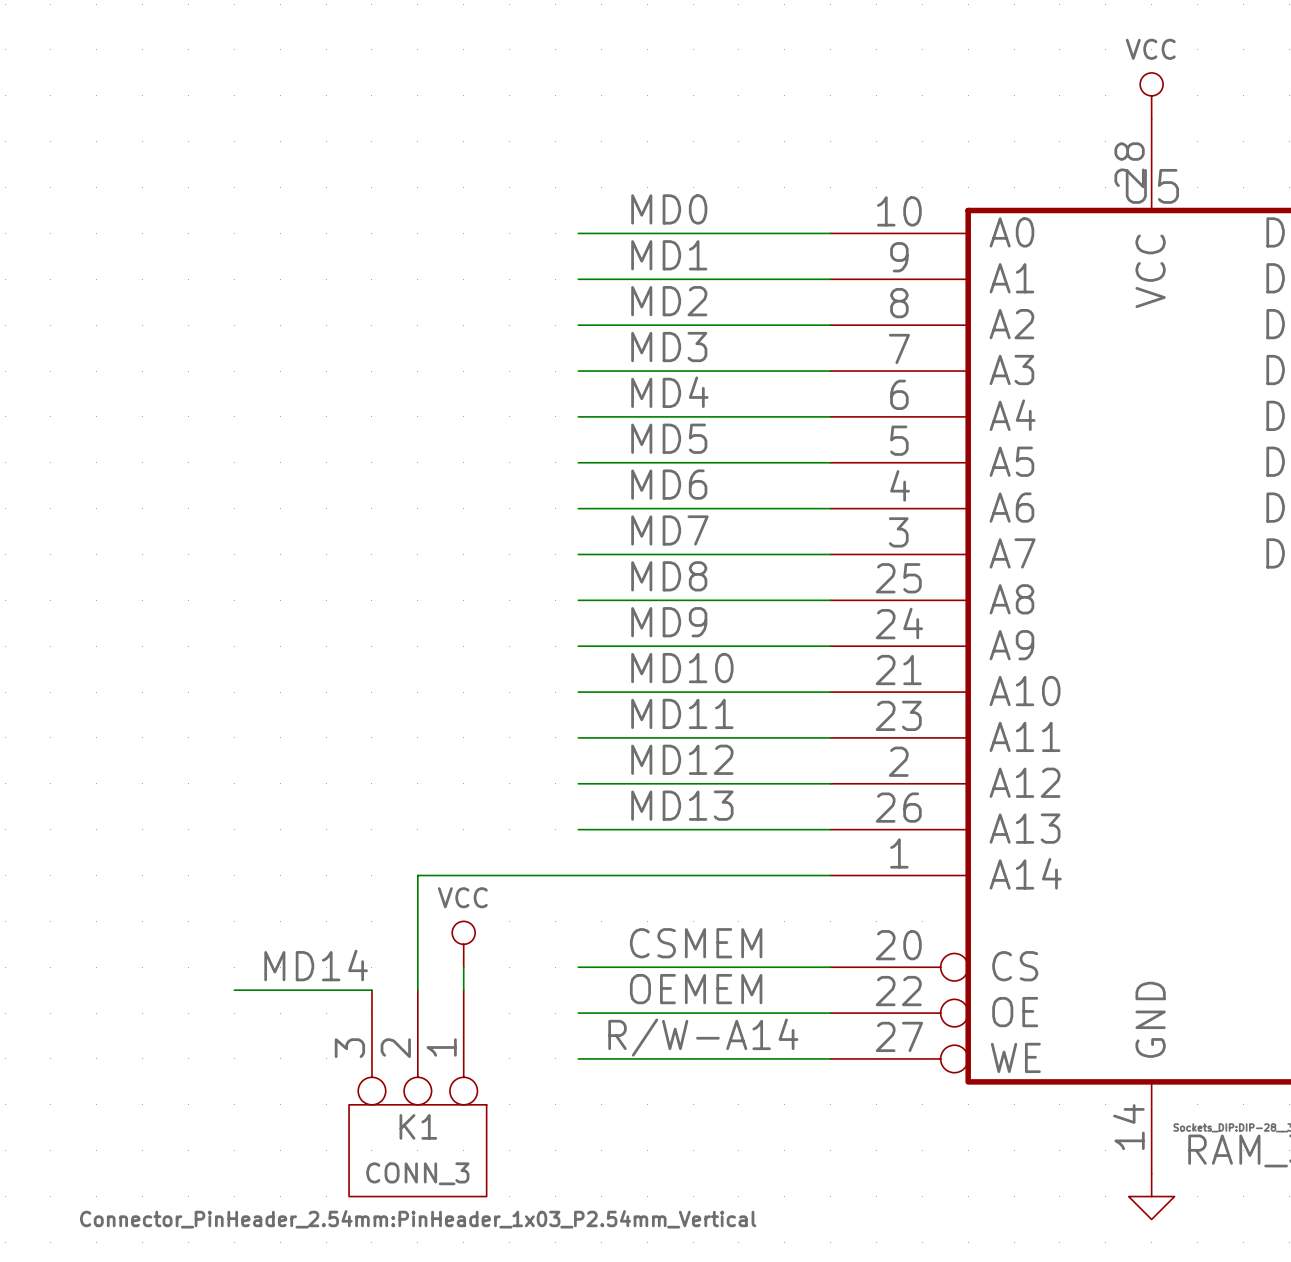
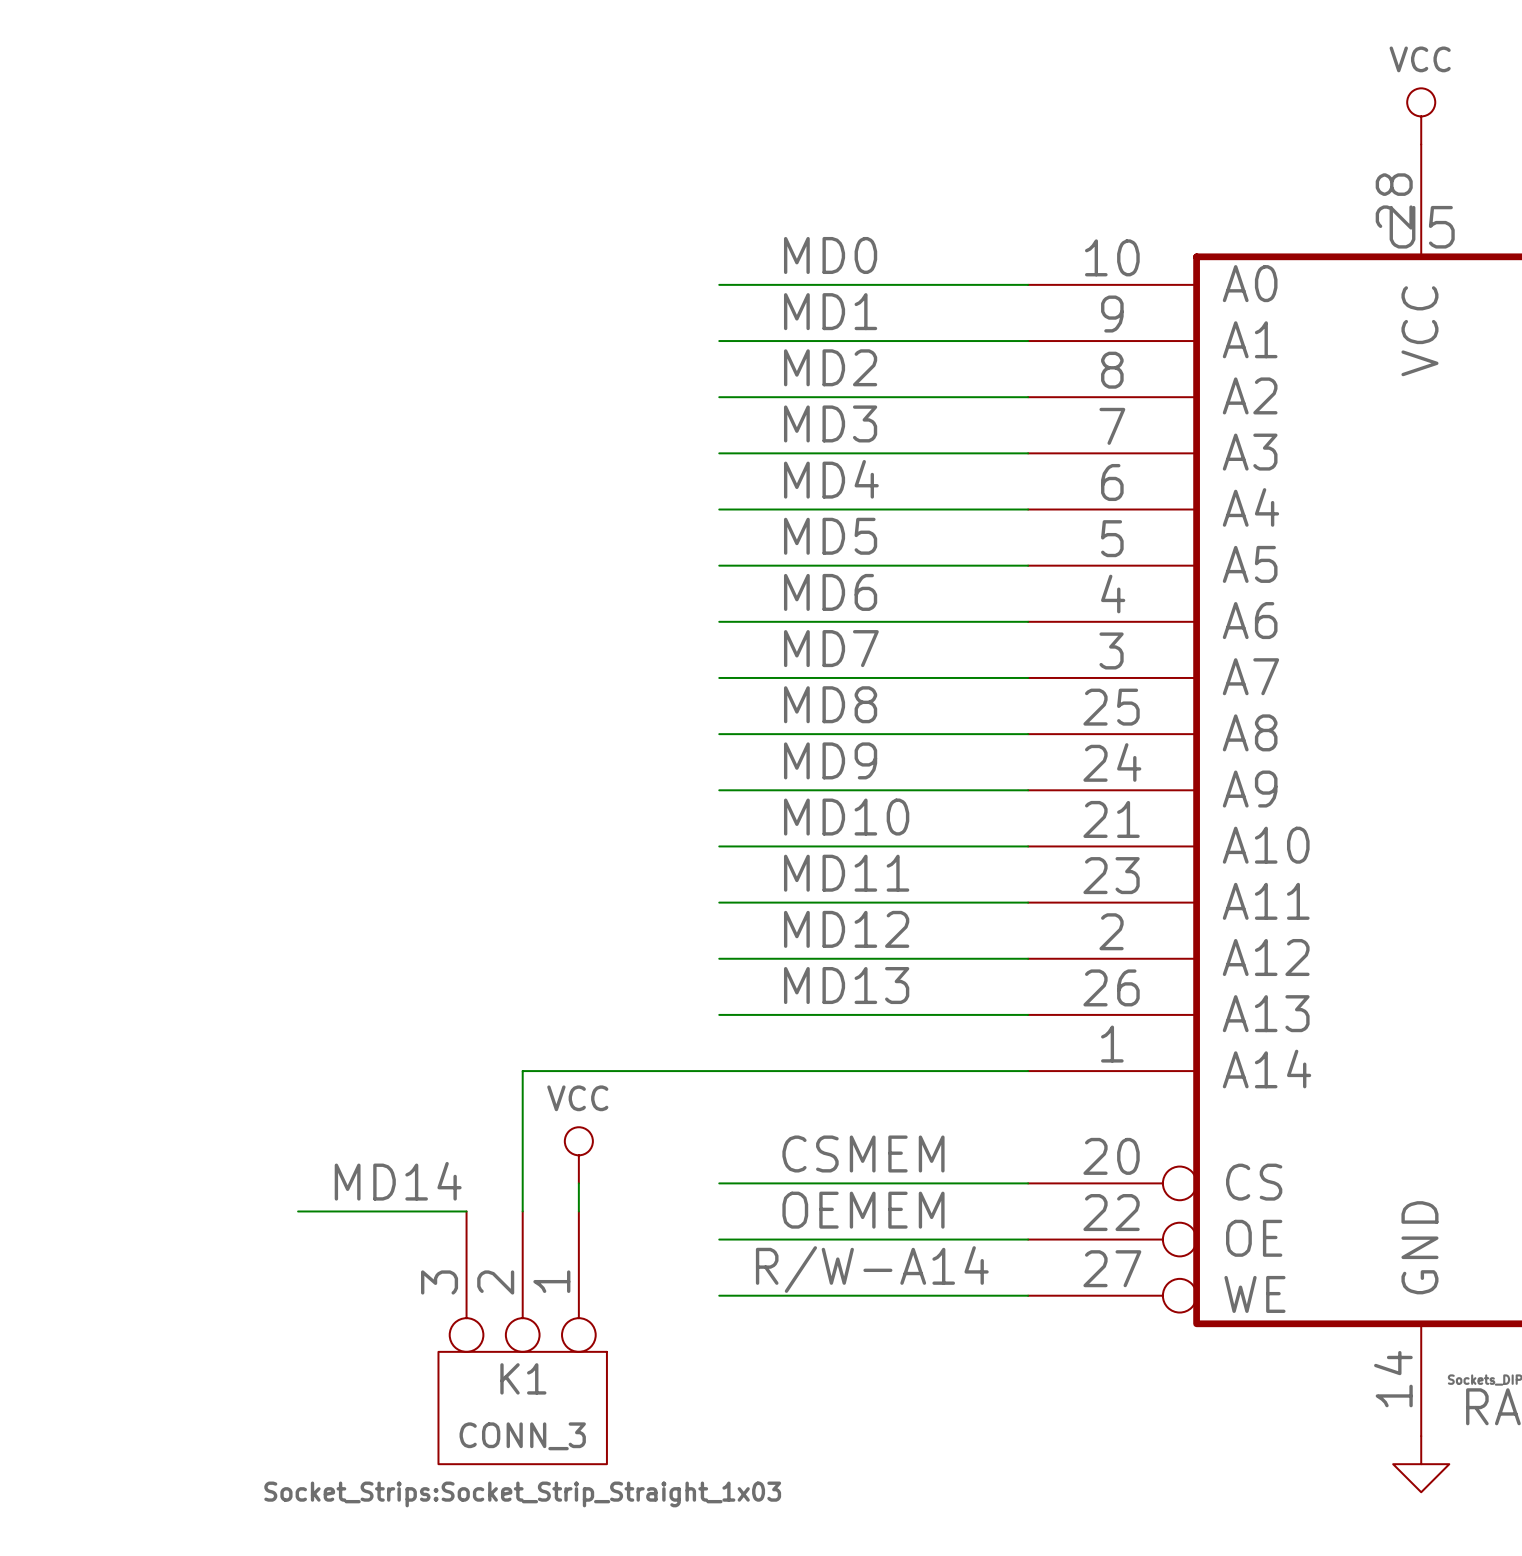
K1 text: Connector_PinHeader_2.54mm:PinHeader_1x03_P2.54mm_Vertical (418, 1219) -> Socket_Strips:Socket_Strip_Straight_1x03 (522, 1494)

